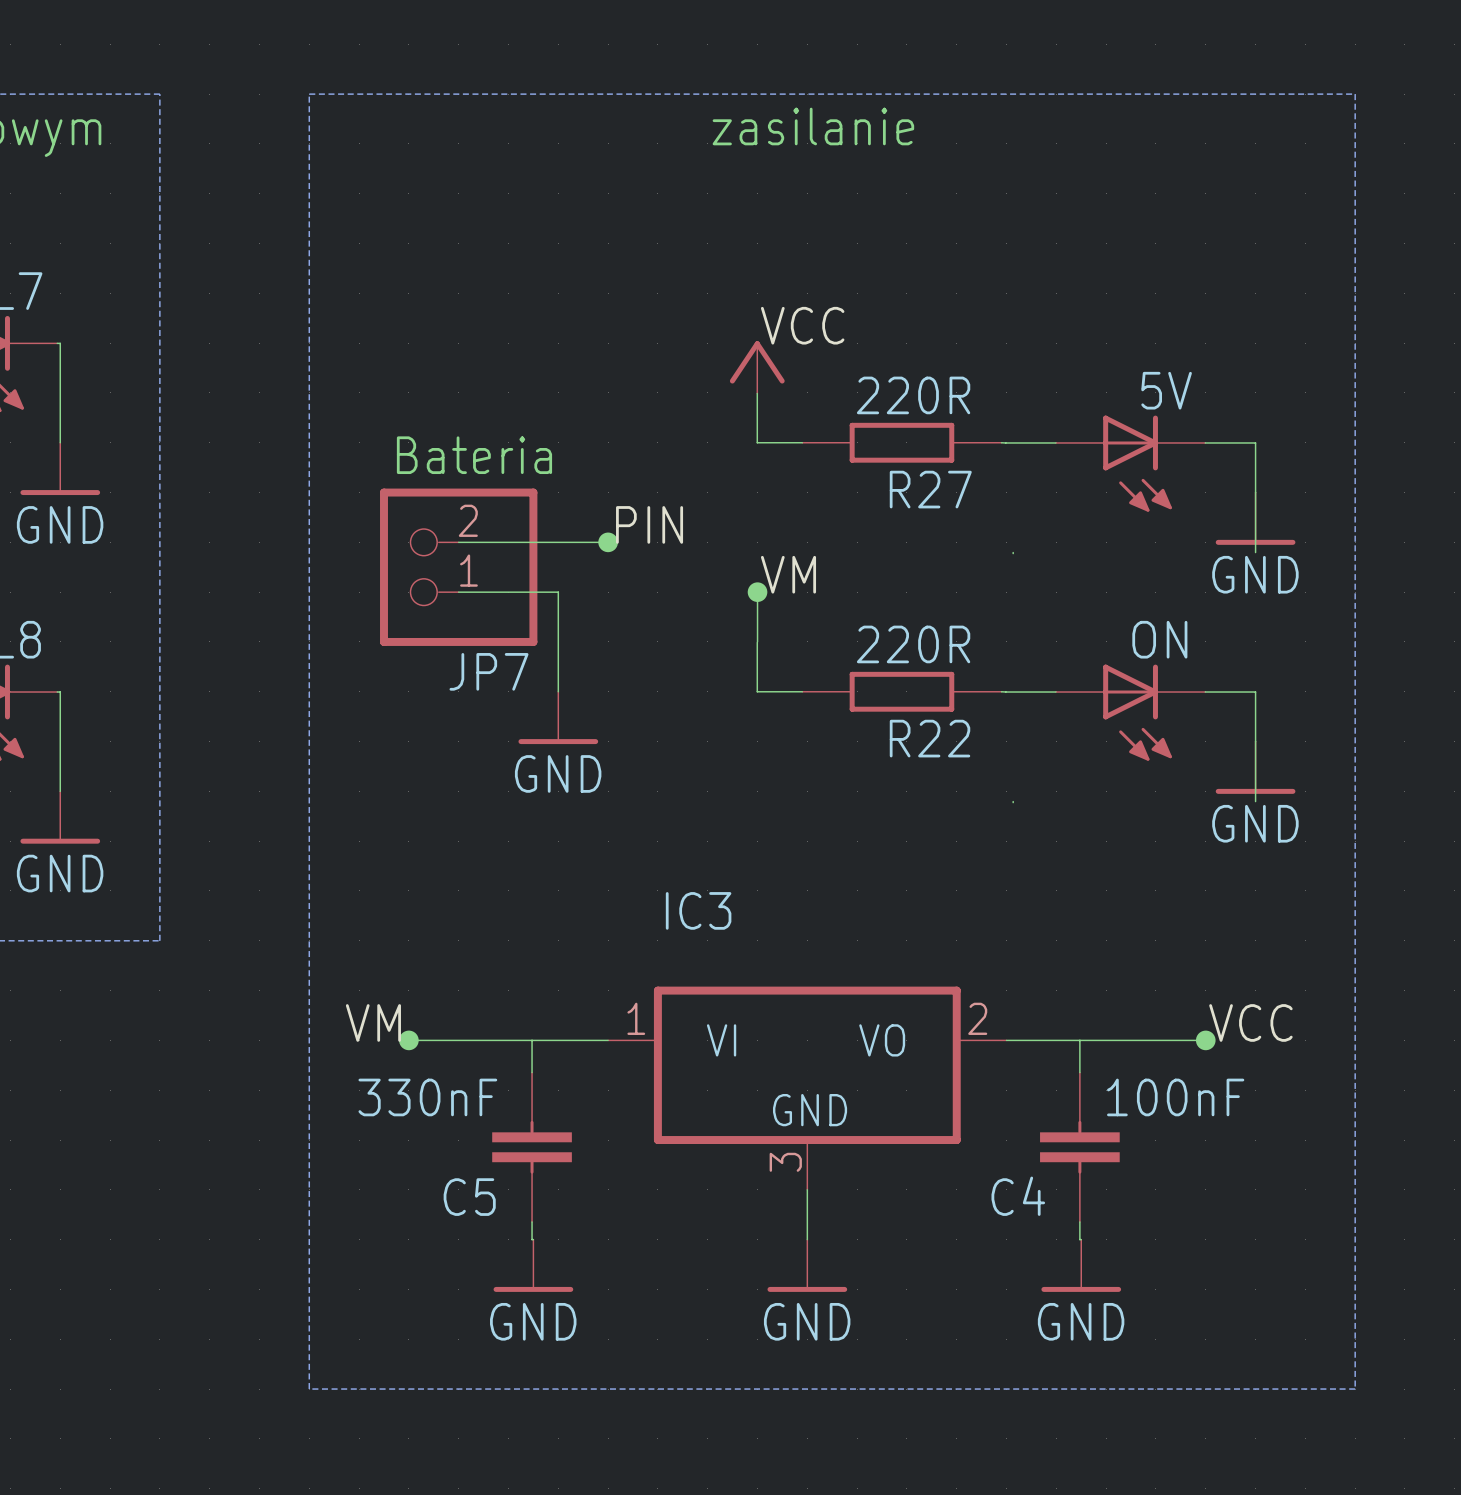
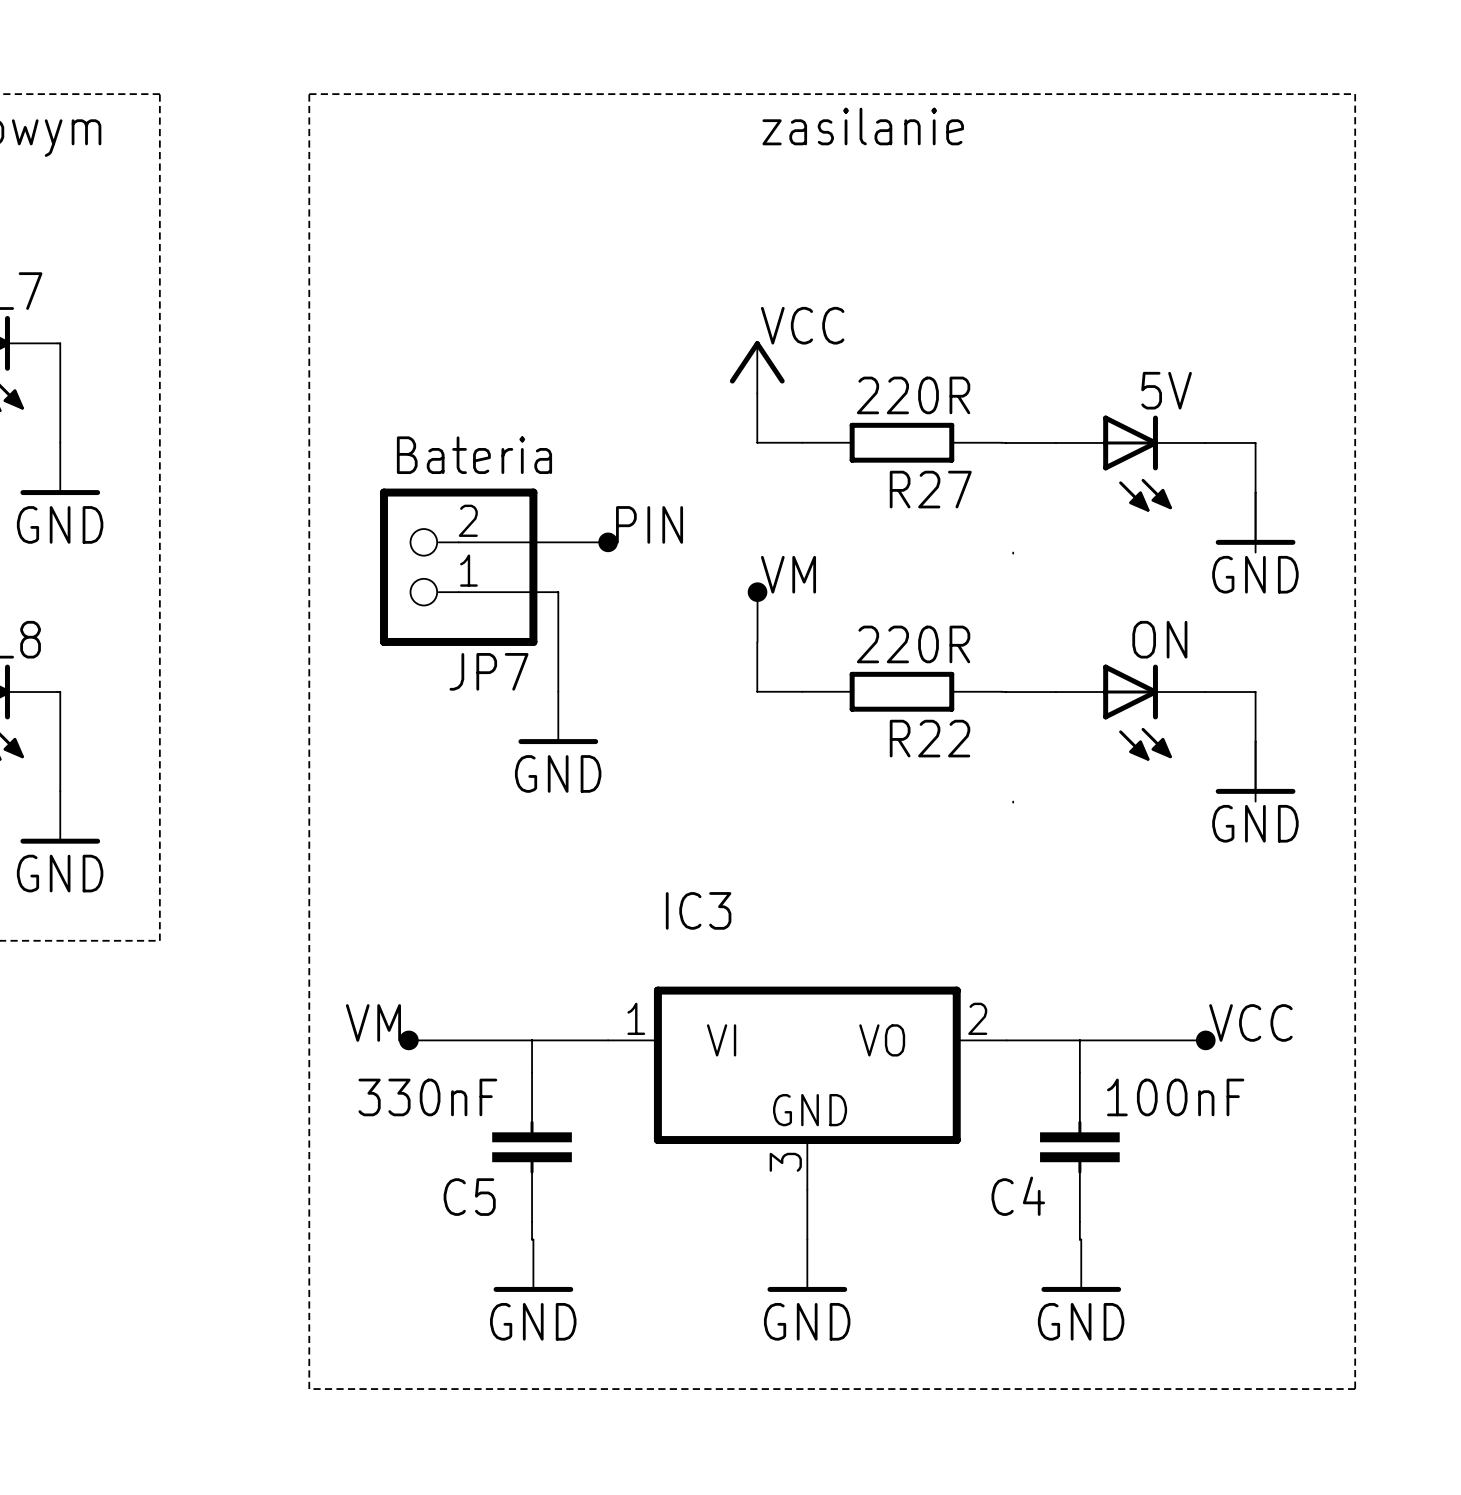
text position: zasilanie (813, 126) -> zasilanie (863, 126)

